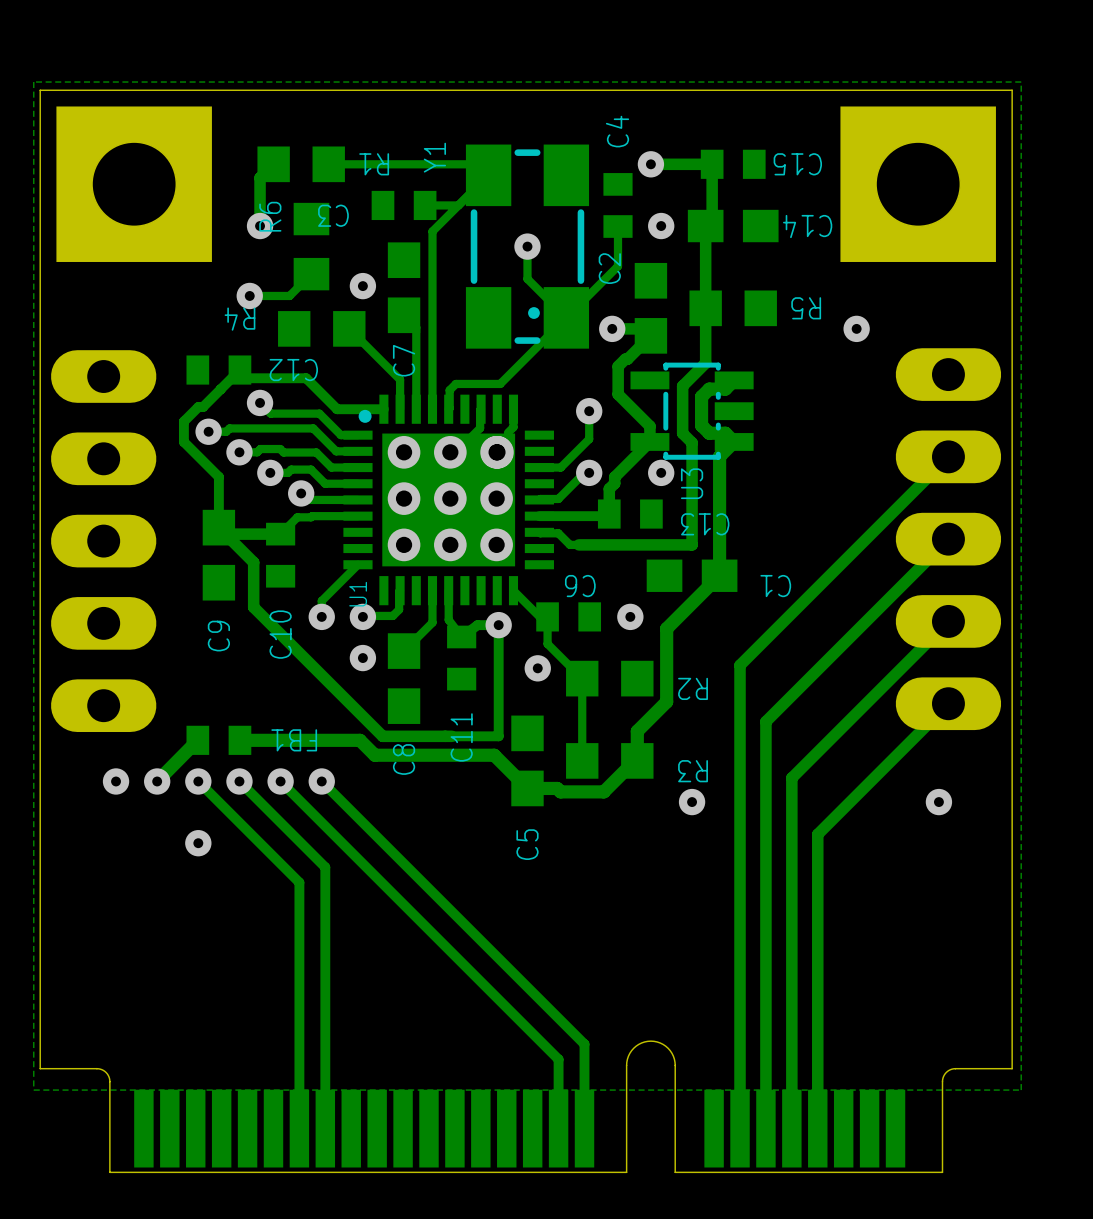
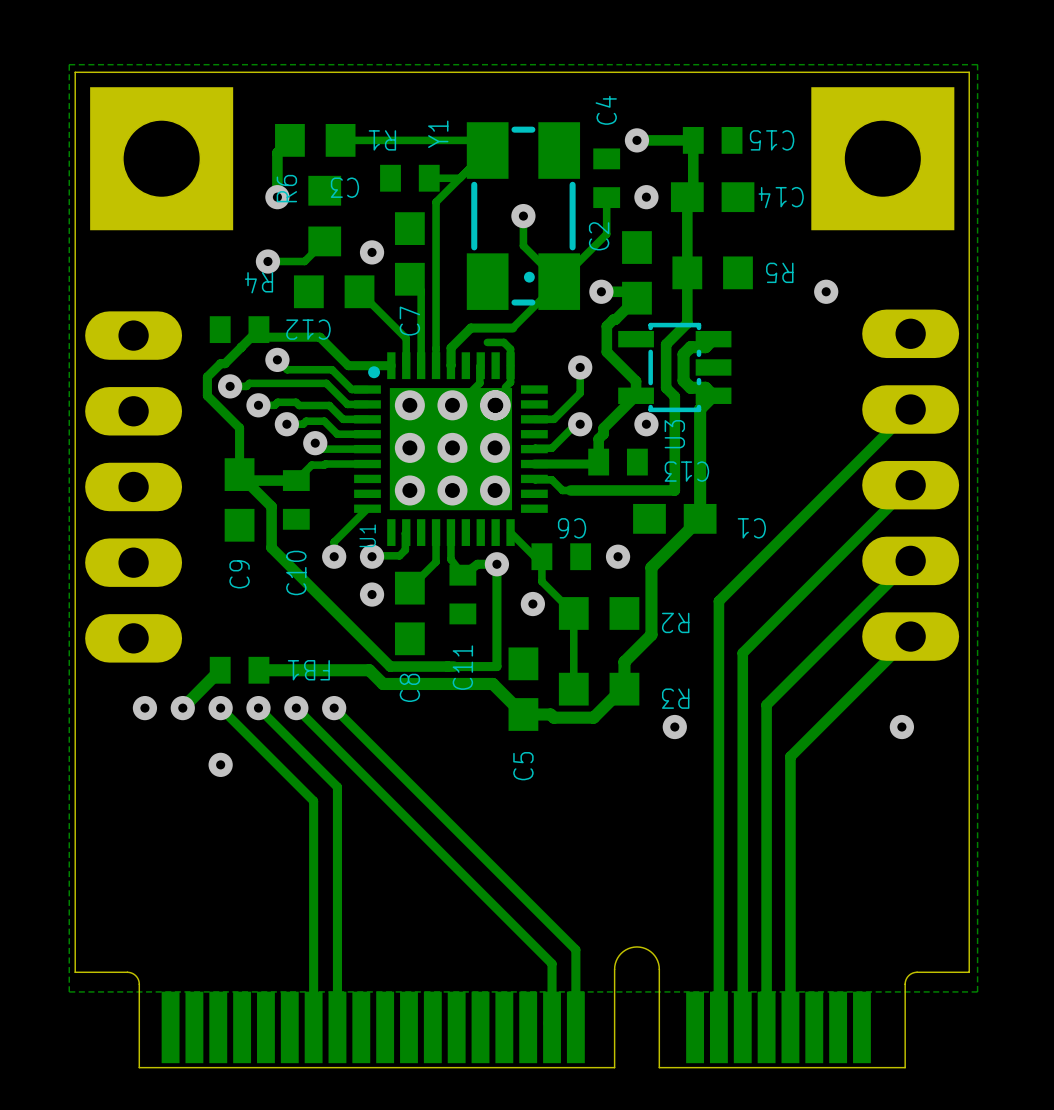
track: (515, 368) (500, 383) -> (510, 365) (510, 349) (503, 342) (498, 342)
track: (488, 383) (455, 383) (449, 390) (448, 409) -> (512, 328) (470, 328) (451, 347) (451, 365)

